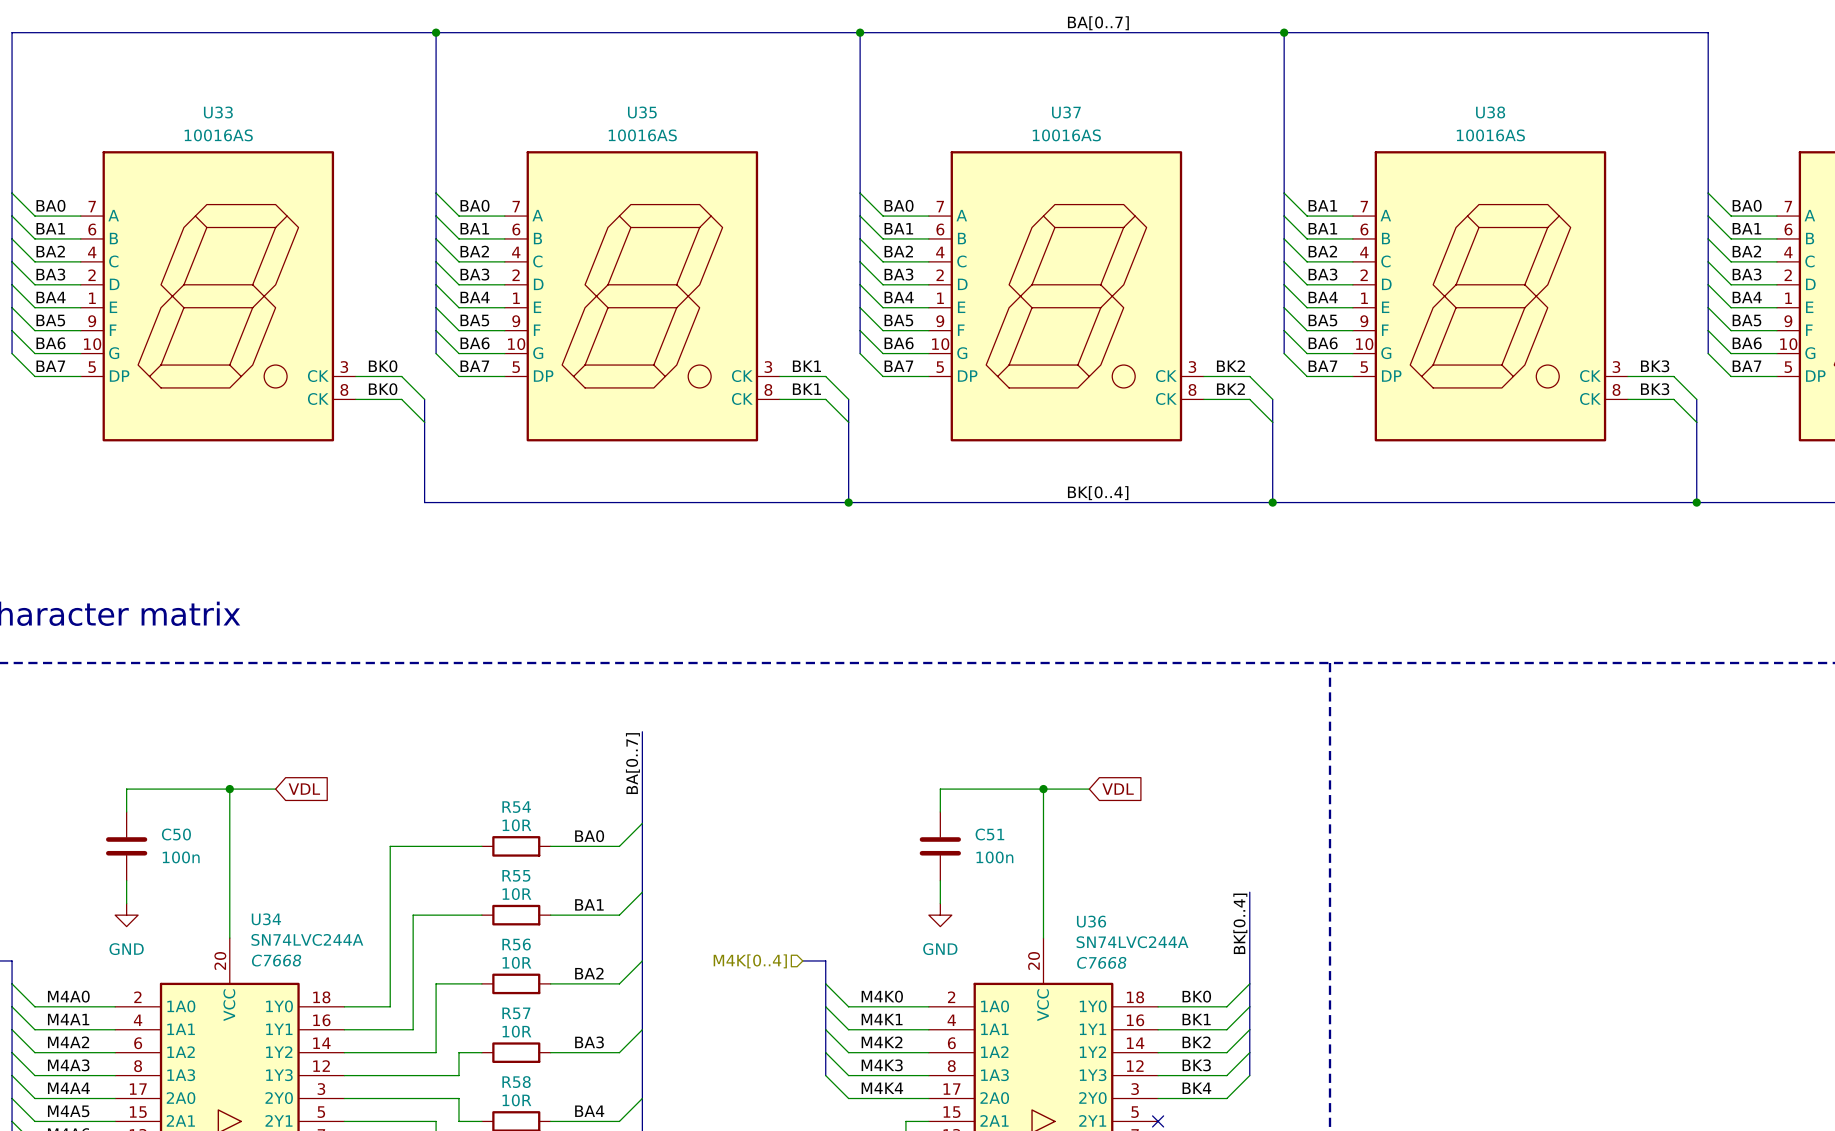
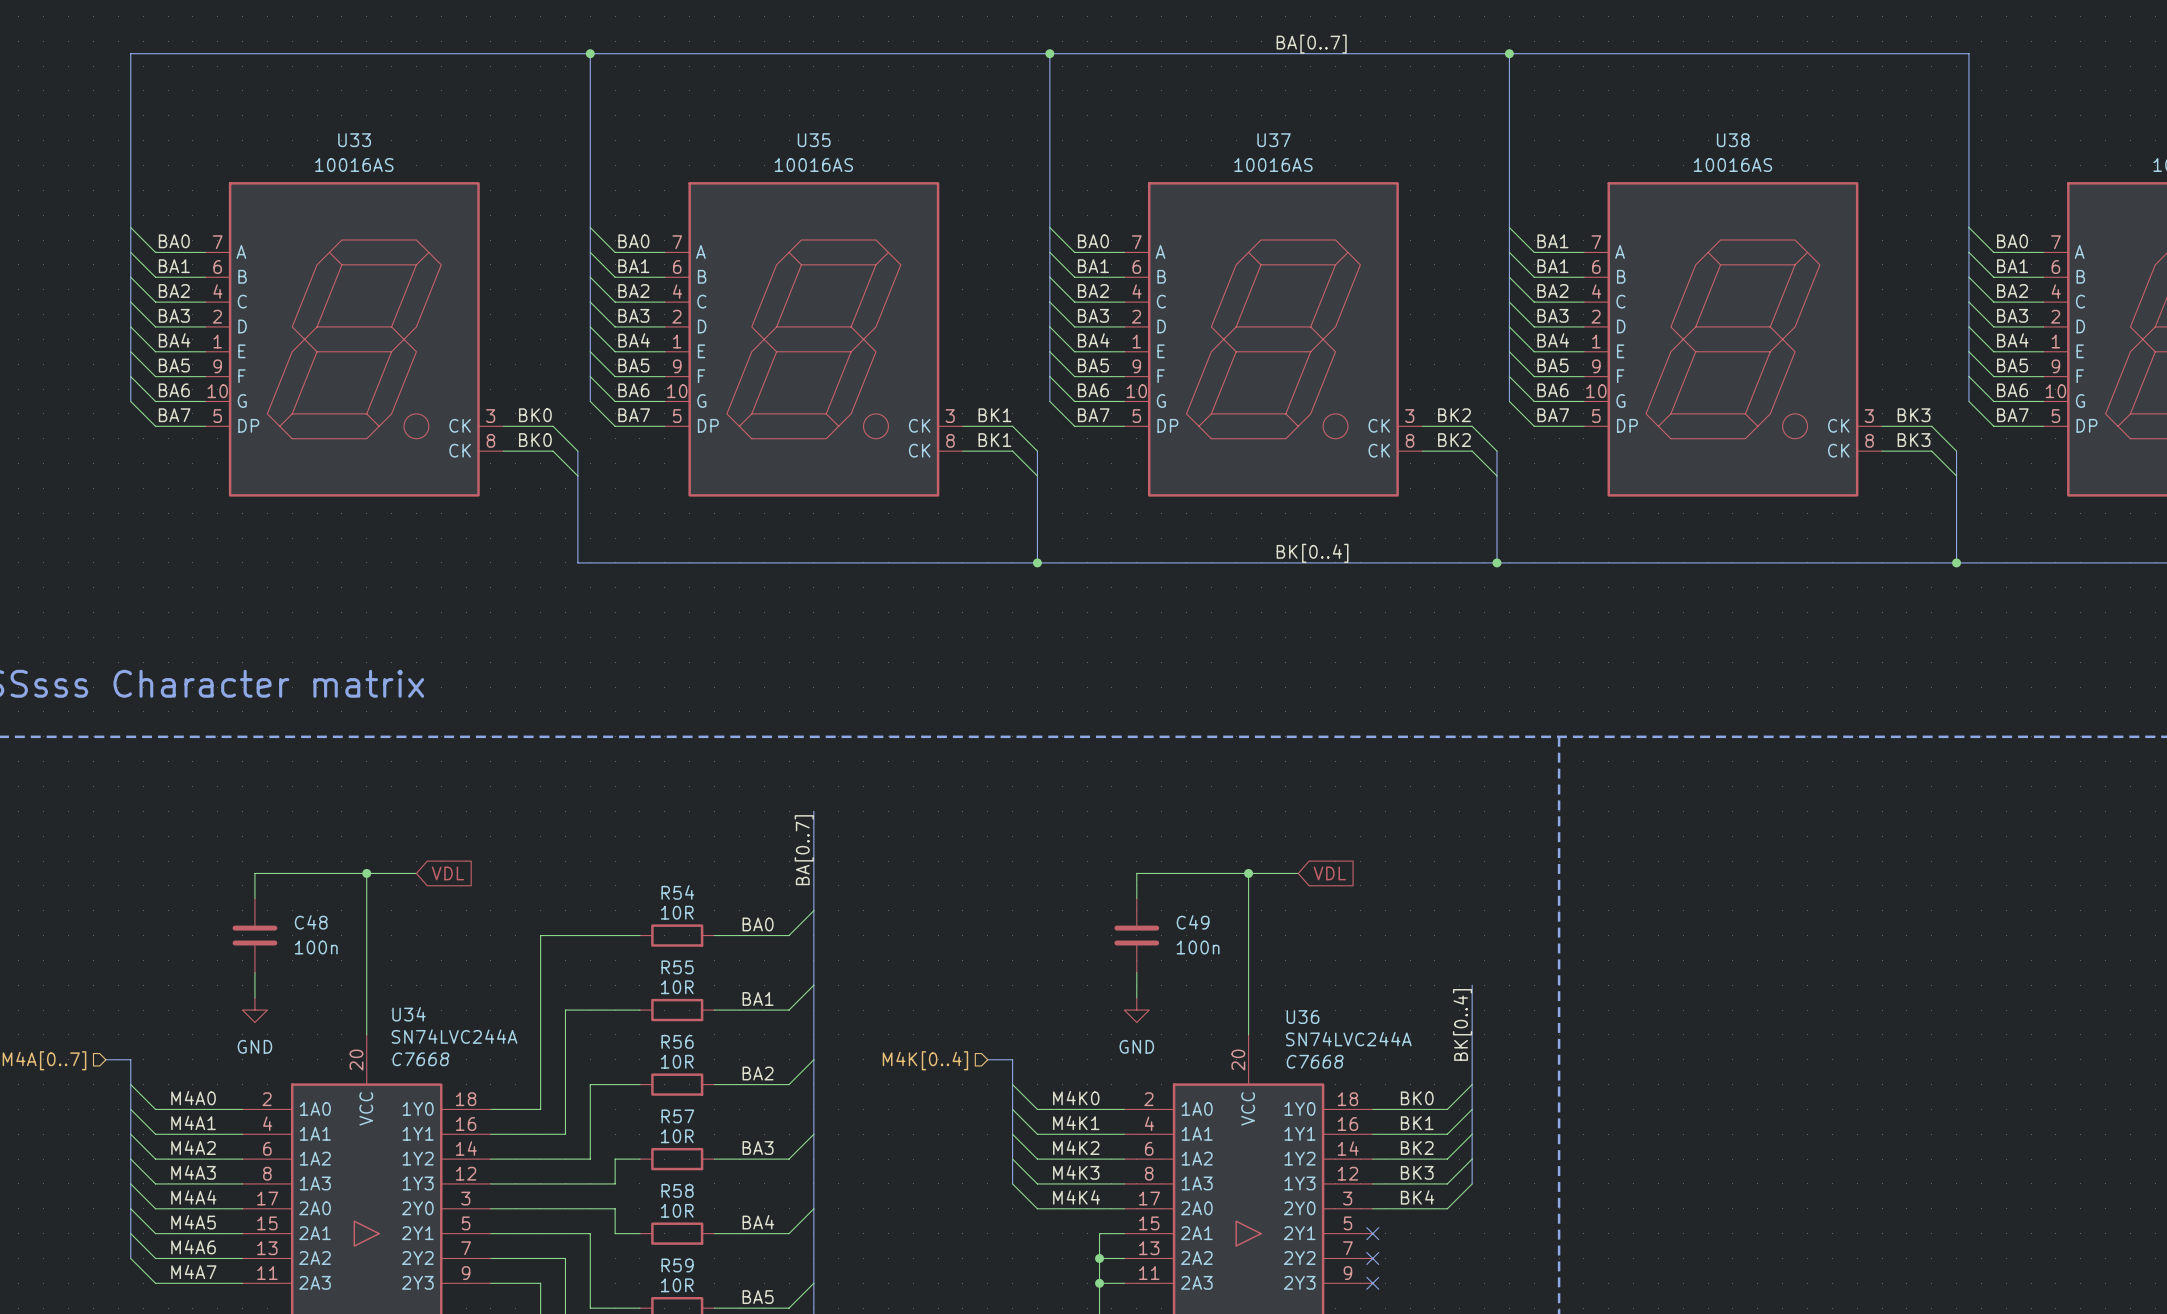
C50 name: C50 (176, 834) -> C48 (311, 922)
C51 name: C51 (989, 834) -> C49 (1193, 922)

